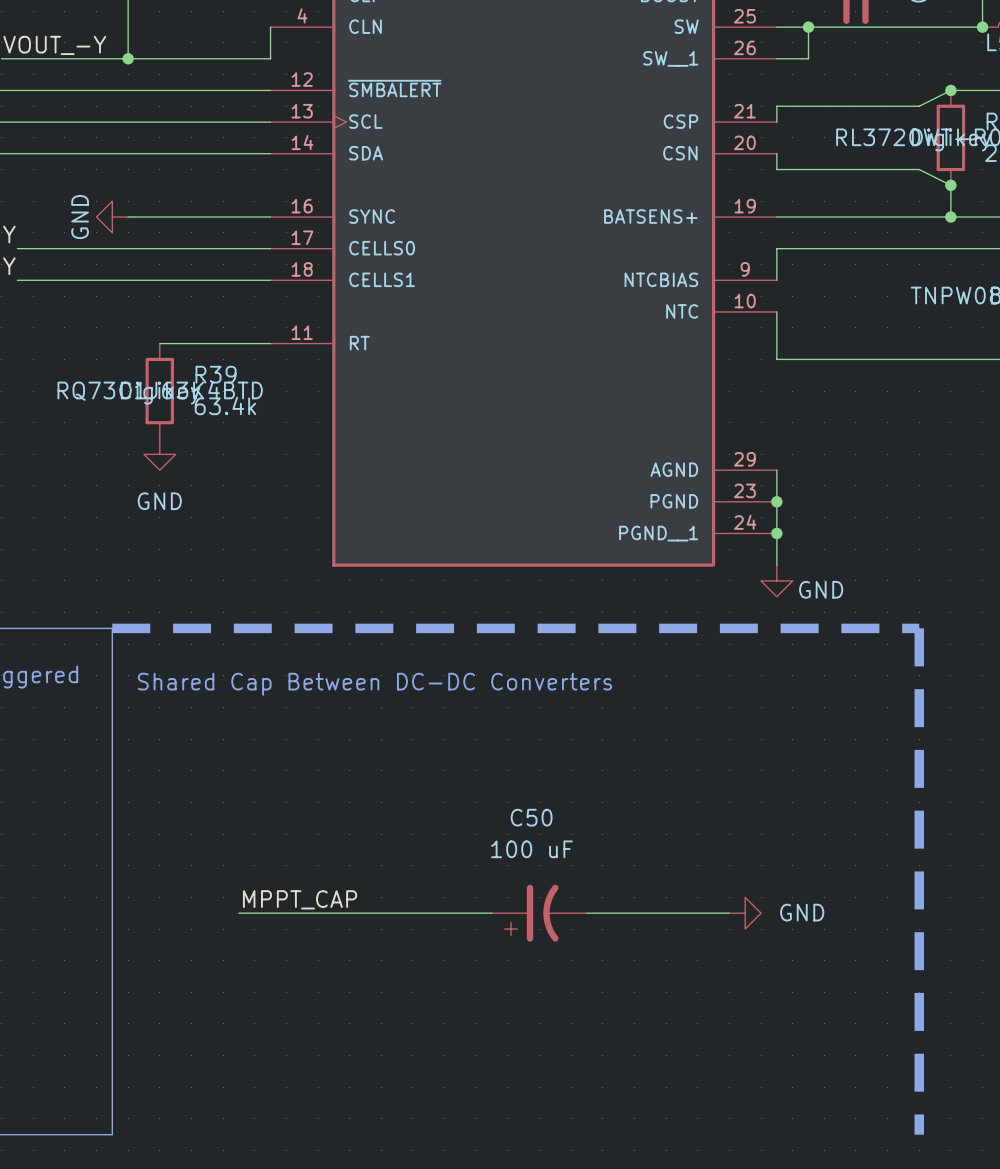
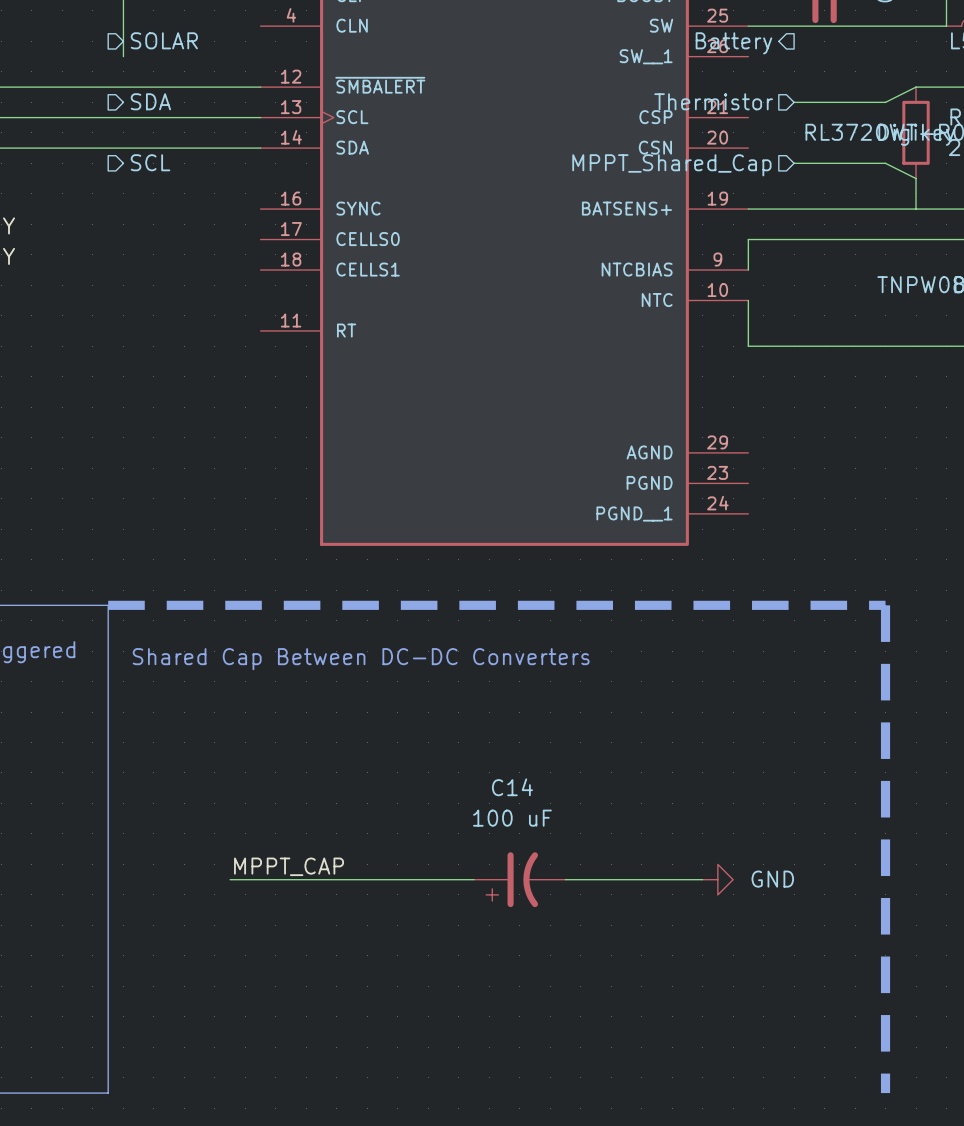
wire: (270, 27) (270, 58) (1, 58) -> none
wire: (808, 27) (808, 58) (776, 58) -> none
junction: (808, 27) -> none
junction: (982, 27) -> none
sheet pin: none -> SOLAR (164, 40)
label: VOUT_-Y (54, 45) -> none
sheet pin: none -> Battery (733, 43)
junction: (128, 58) -> none
junction: (950, 90) -> none
sheet pin: none -> SDA (150, 101)
sheet pin: none -> Thermistor (713, 101)
wire: (824, 106) (776, 106) (776, 122) -> none
wire: (776, 153) (776, 169) (824, 169) -> none
sheet pin: none -> SCL (150, 162)
sheet pin: none -> MPPT_Shared_Cap (671, 165)
junction: (950, 185) -> none
power symbol: GND (112, 217) -> none
wire: (128, 217) (270, 217) -> none
junction: (950, 217) -> none
wire: (17, 248) (270, 248) -> none
wire: (17, 280) (270, 280) -> none
wire: (159, 343) (270, 343) -> none
R39: 63.4k (159, 391) -> none
power symbol: GND (159, 454) -> none
wire: (776, 470) (776, 565) -> none
junction: (776, 501) -> none
junction: (776, 533) -> none
power symbol: GND (776, 580) -> none
C50 name: C50 (531, 817) -> C14 (512, 787)

